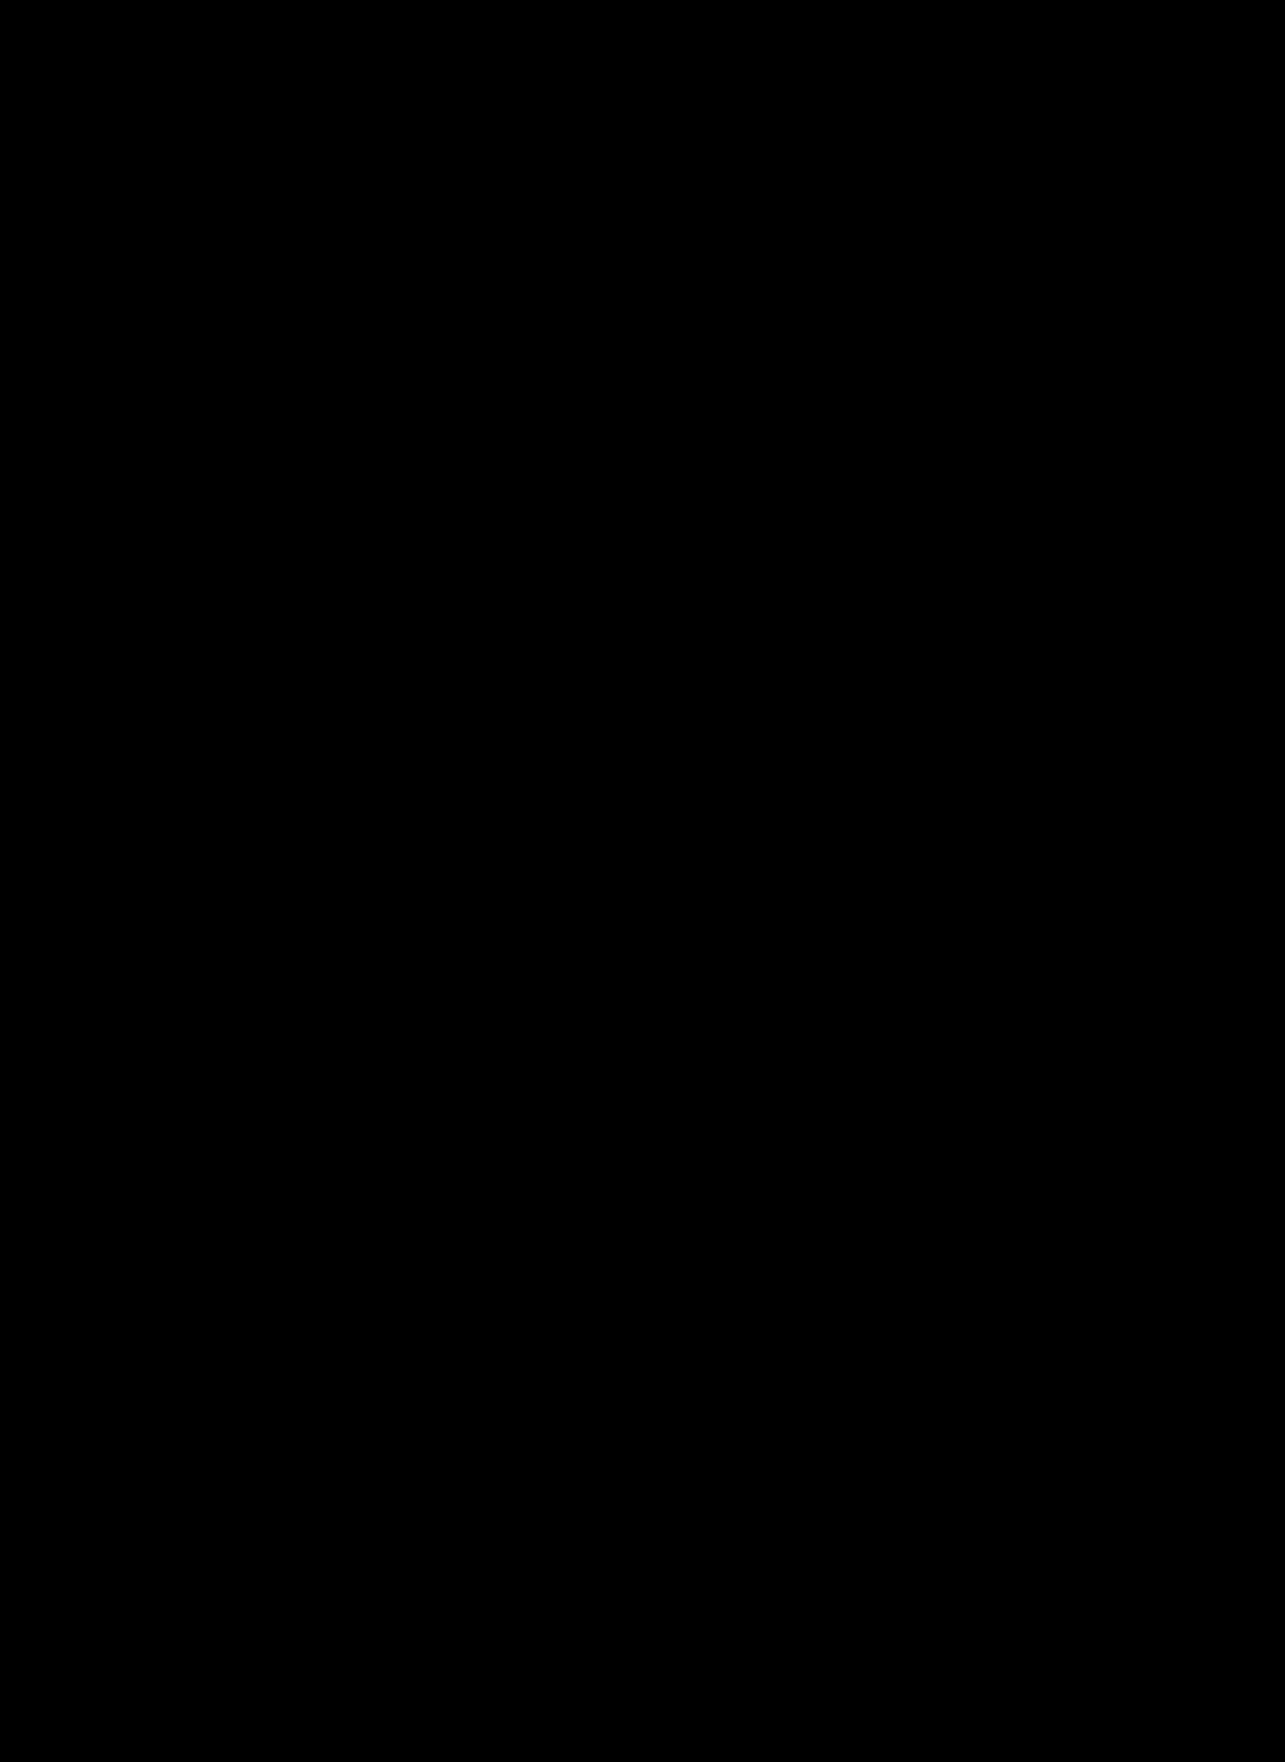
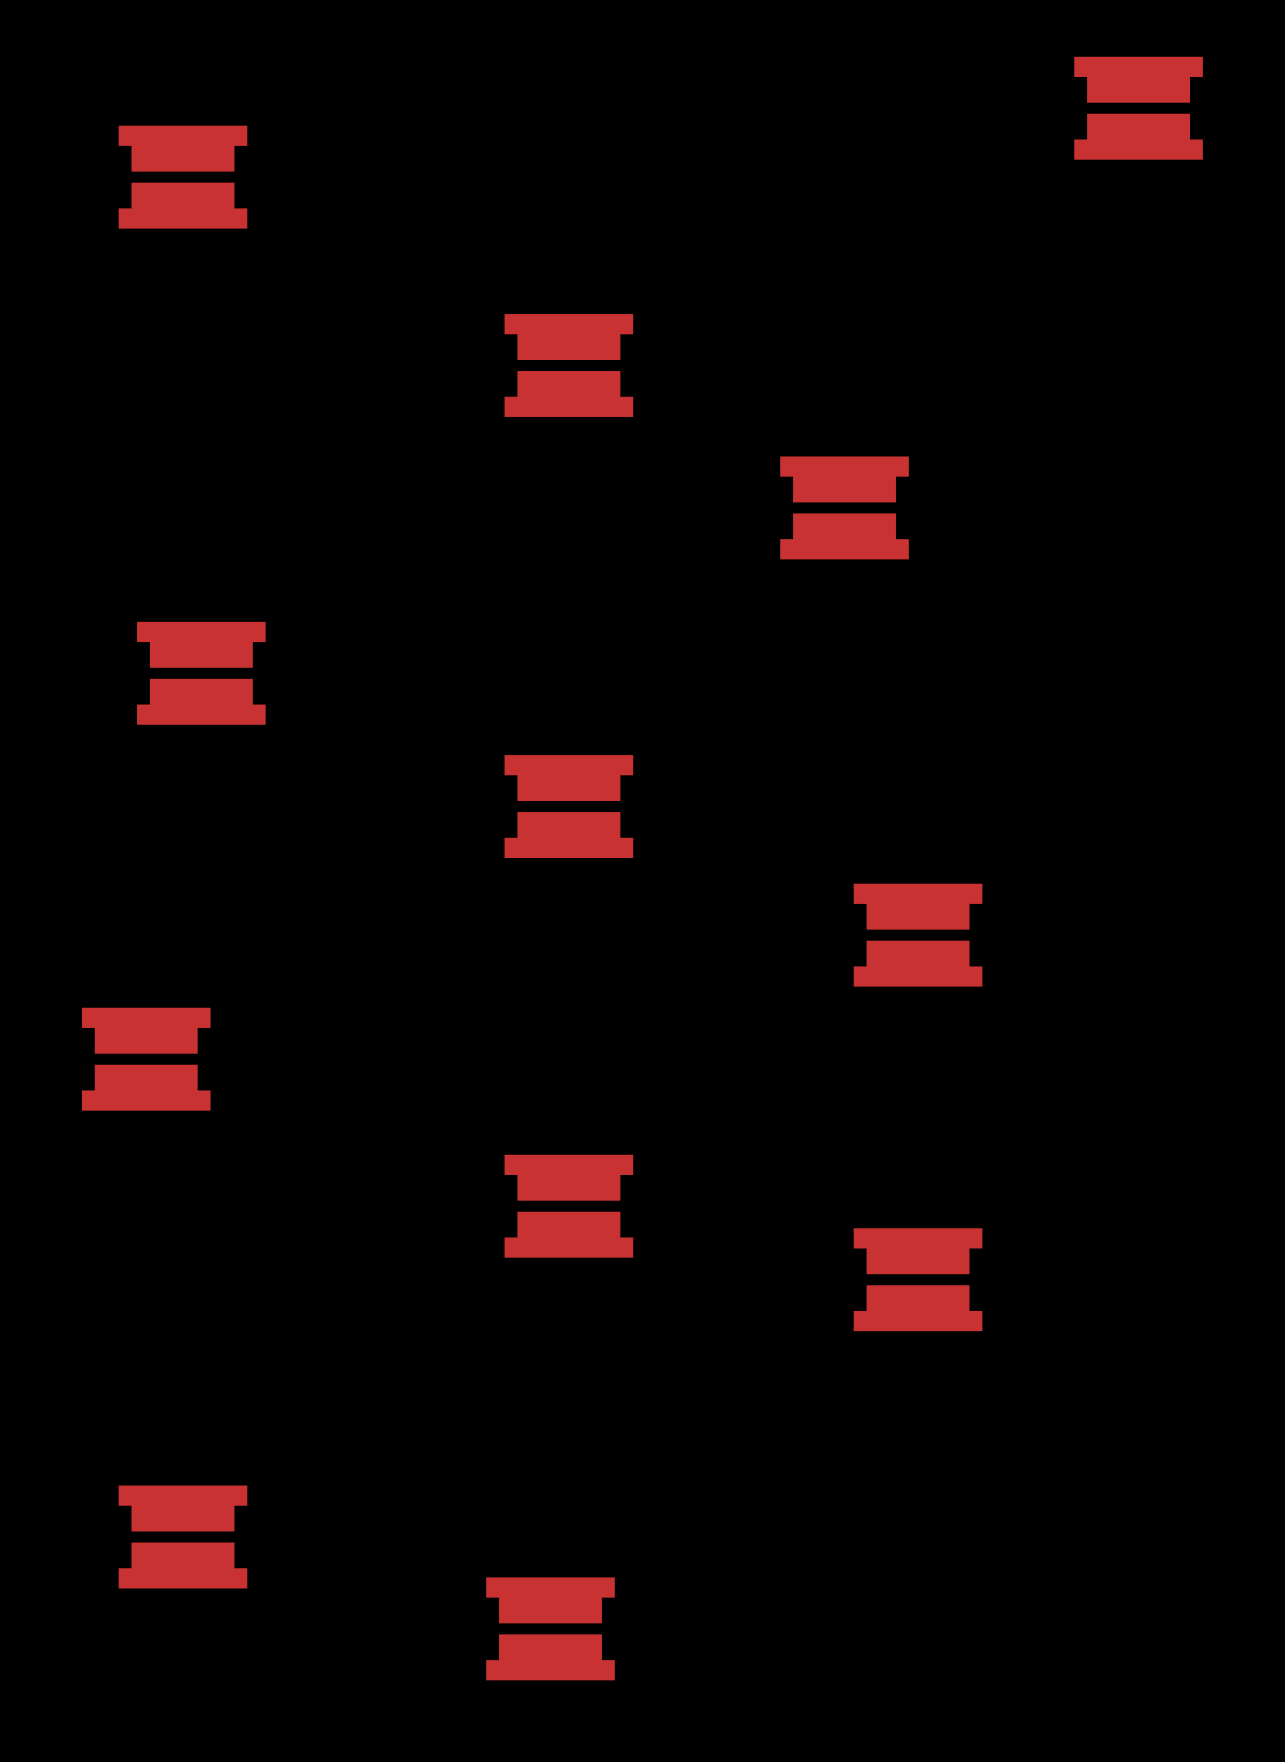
part: none -> (1138, 108)
part: none -> (182, 177)
part: none -> (568, 365)
part: none -> (844, 507)
part: none -> (201, 673)
part: none -> (568, 806)
part: none -> (918, 935)
part: none -> (146, 1059)
part: none -> (568, 1206)
part: none -> (918, 1279)
part: none -> (182, 1536)
part: none -> (550, 1628)

